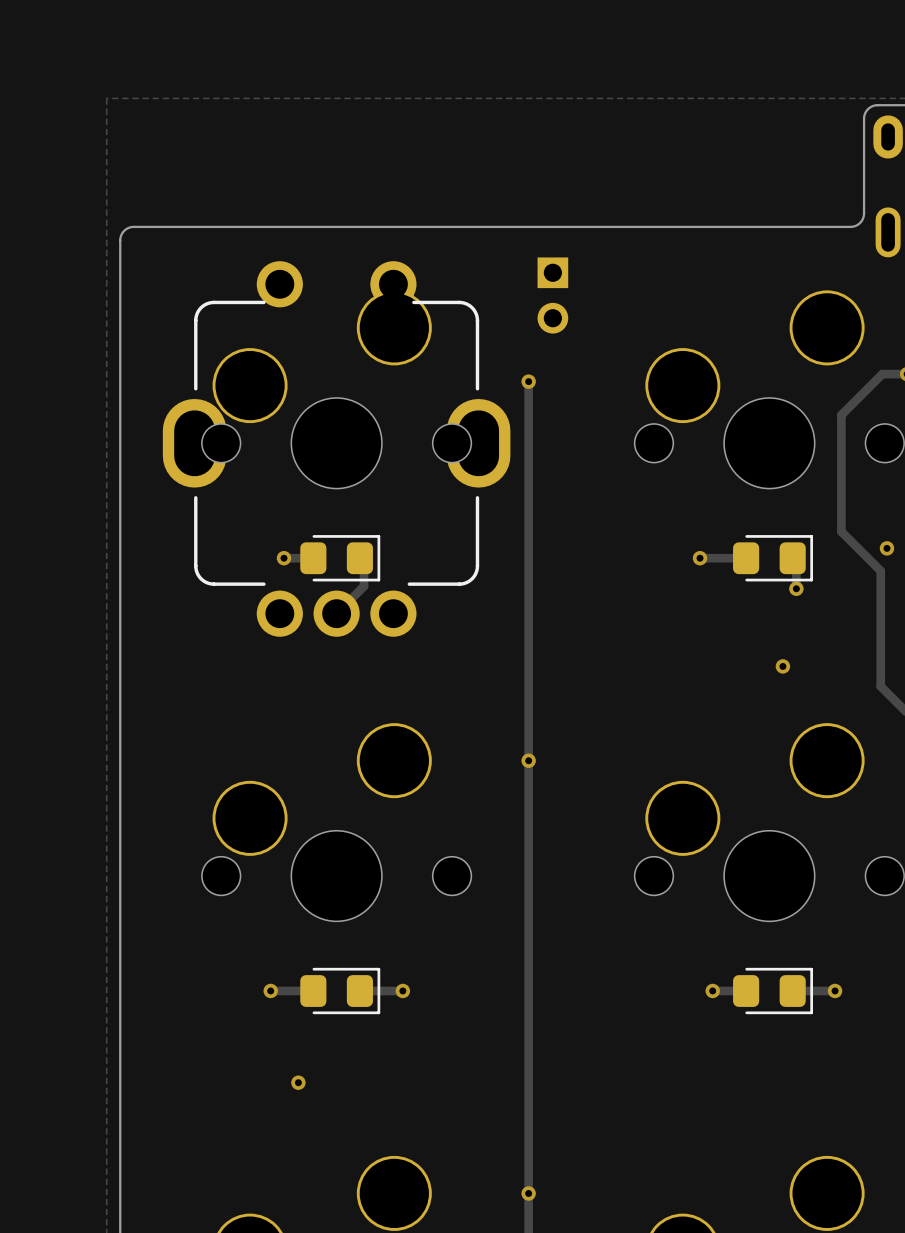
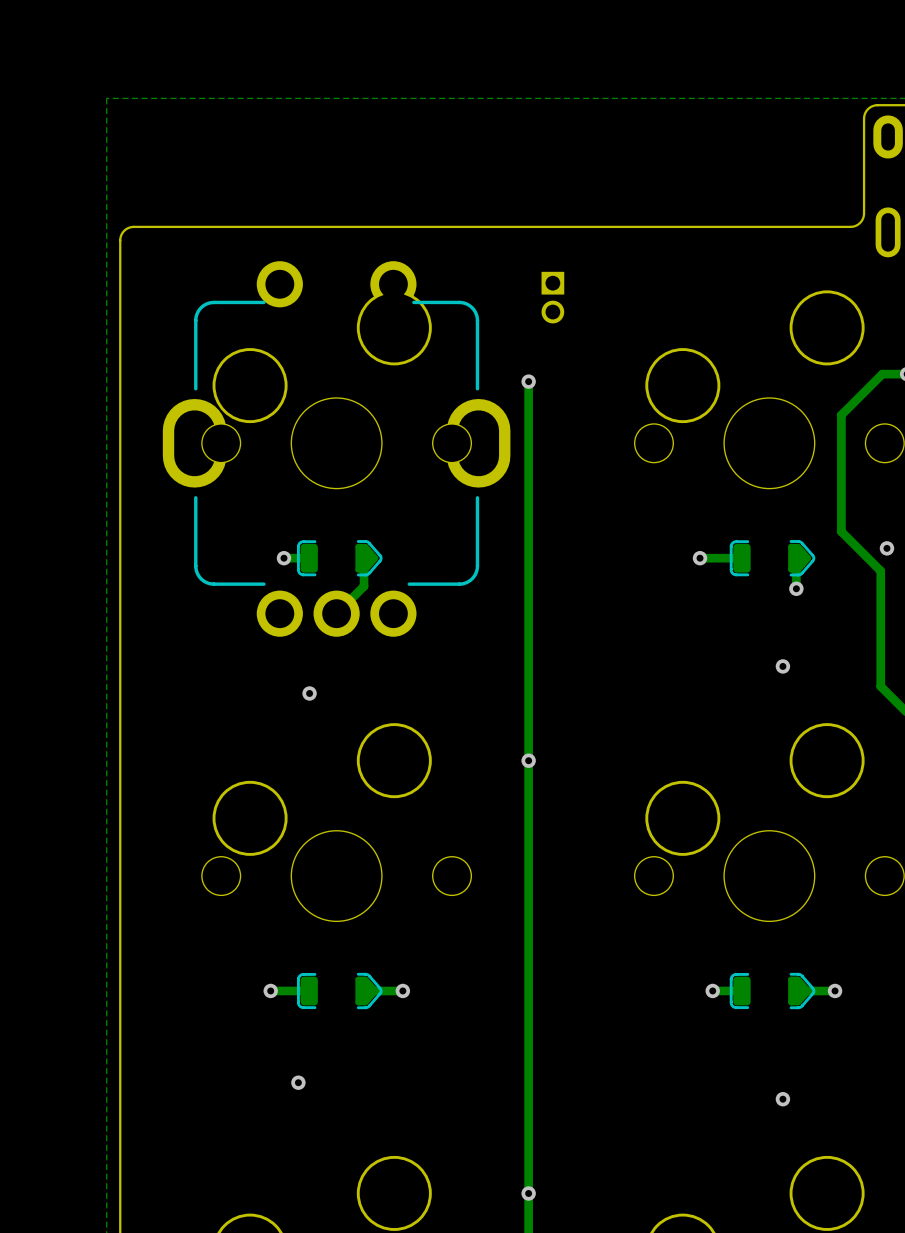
part footprint: [537, 257, 569, 334] -> [541, 271, 565, 324]
part footprint: [300, 535, 381, 582] -> [296, 540, 383, 577]
part footprint: [733, 535, 814, 582] -> [729, 540, 816, 577]
via: none -> (309, 693)
part footprint: [300, 967, 381, 1015] -> [296, 972, 383, 1010]
part footprint: [733, 967, 814, 1015] -> [729, 972, 816, 1010]
via: none -> (782, 1099)

